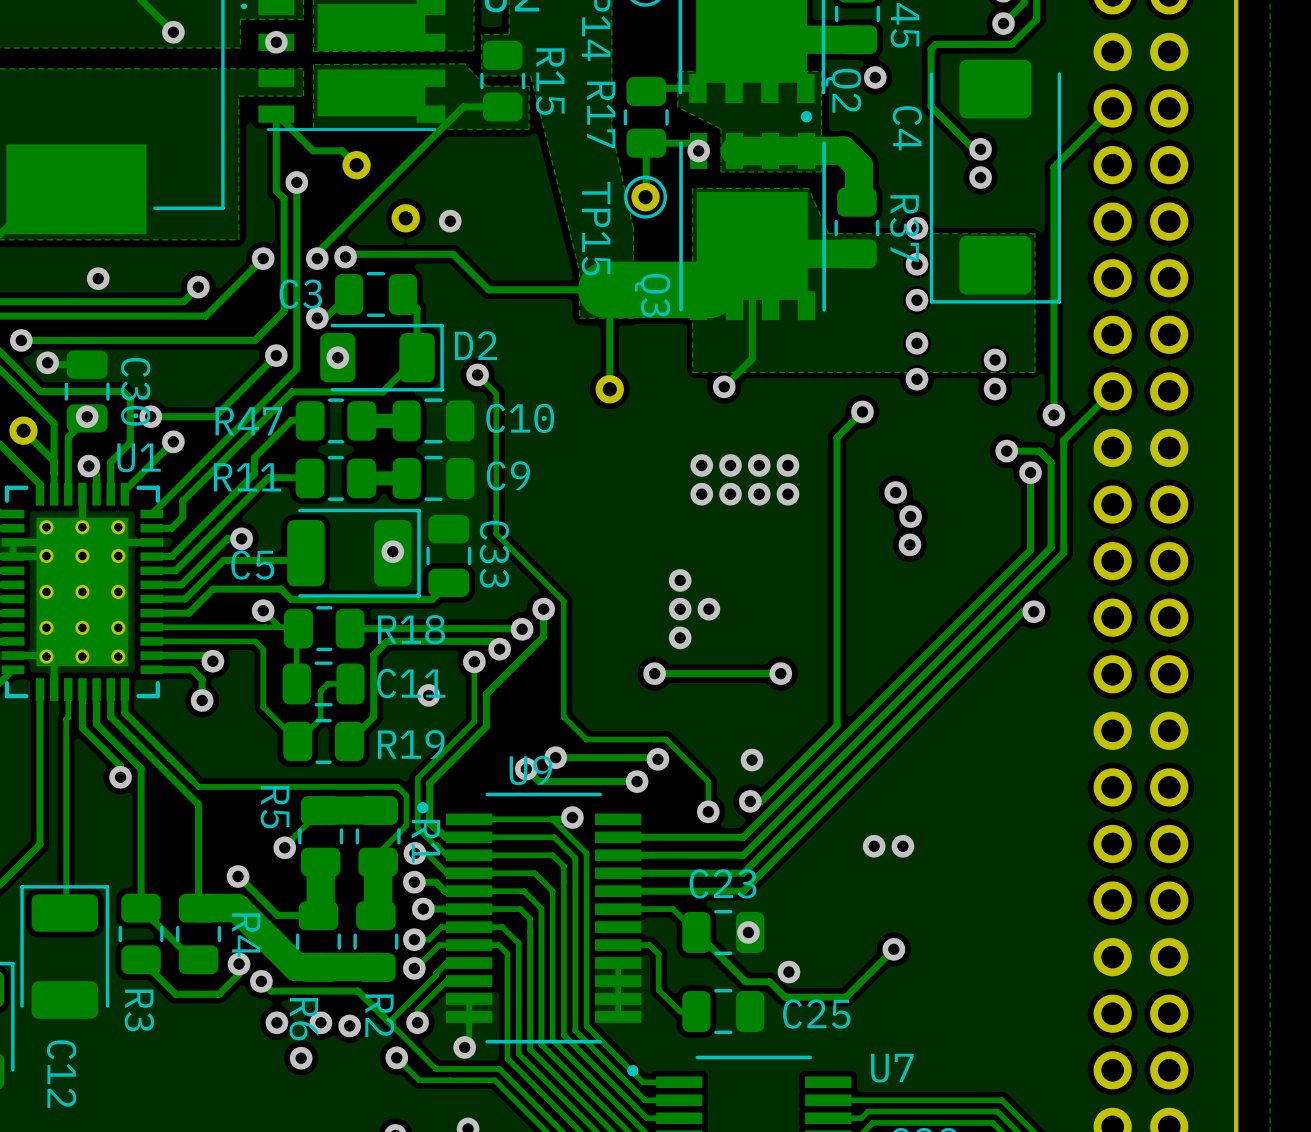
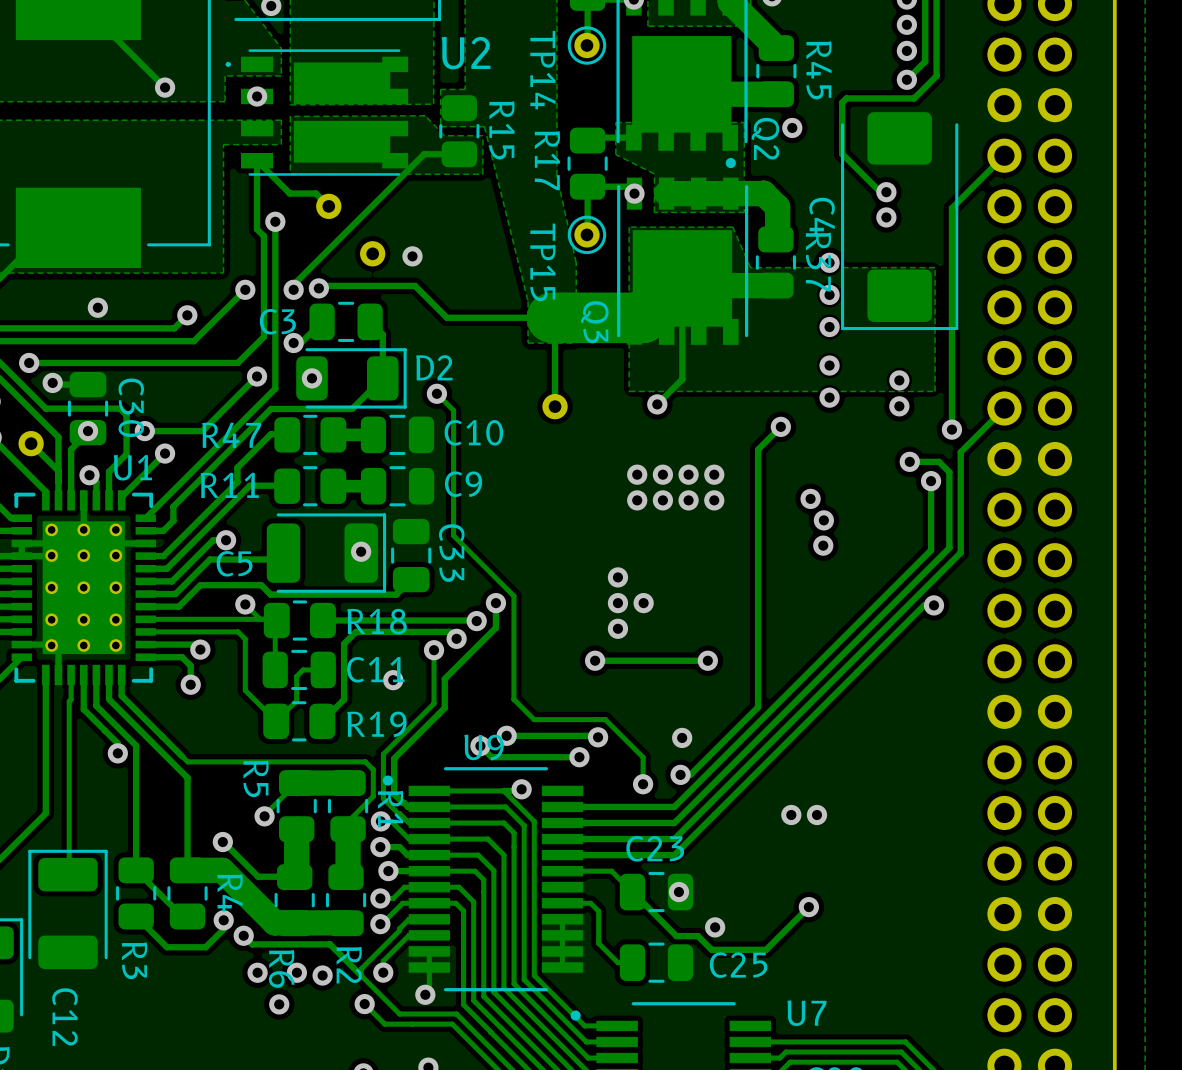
C4 name position: C4 (907, 128) -> C4 (822, 216)

